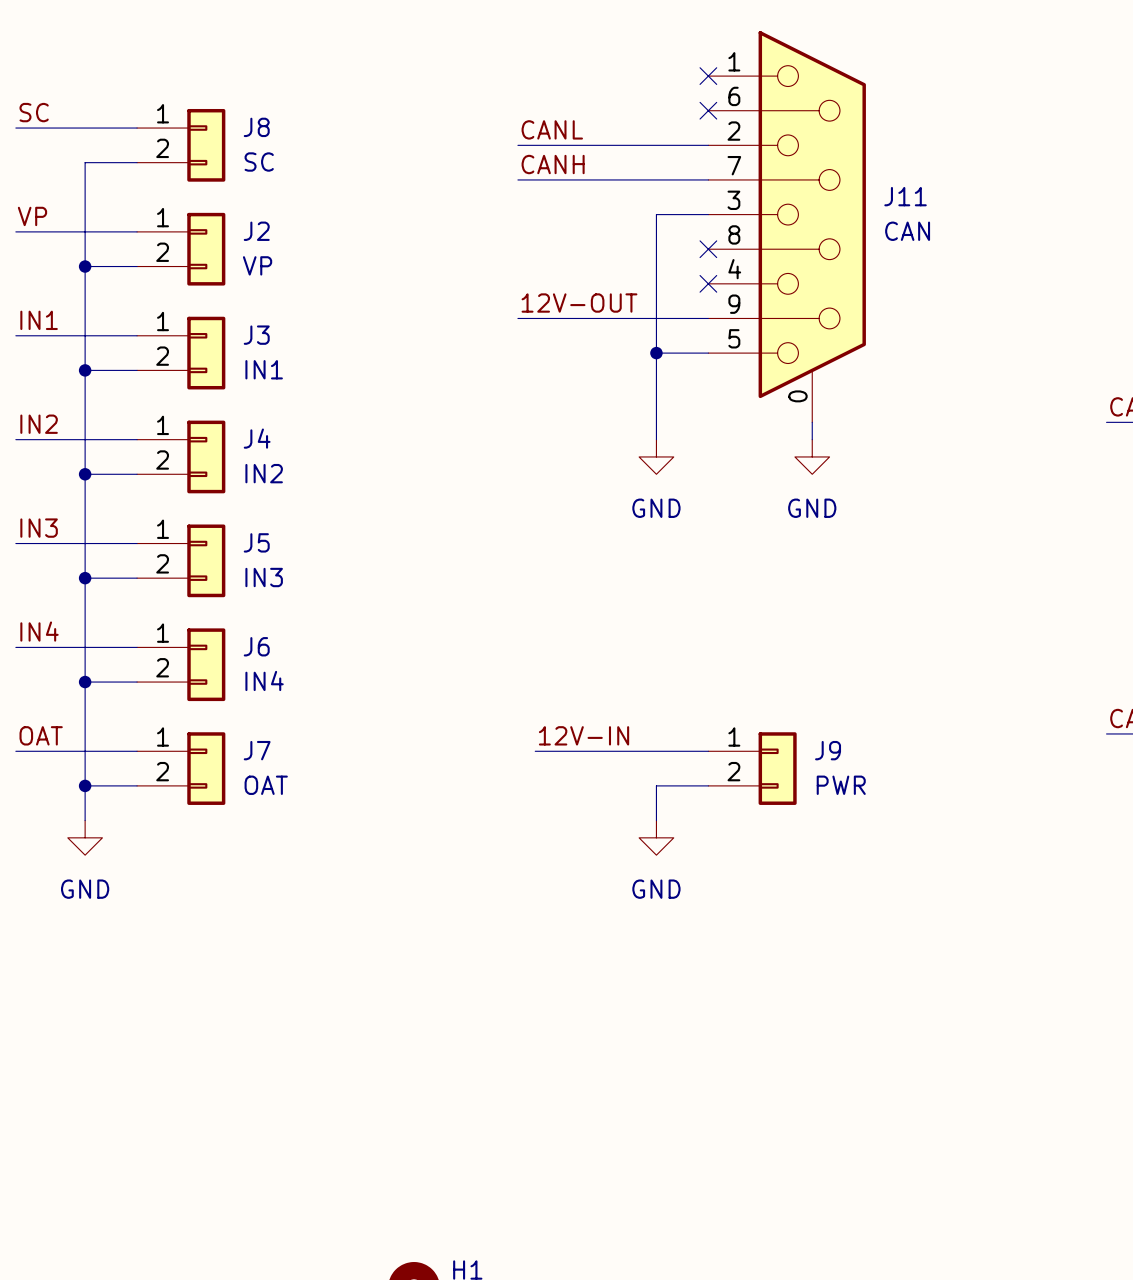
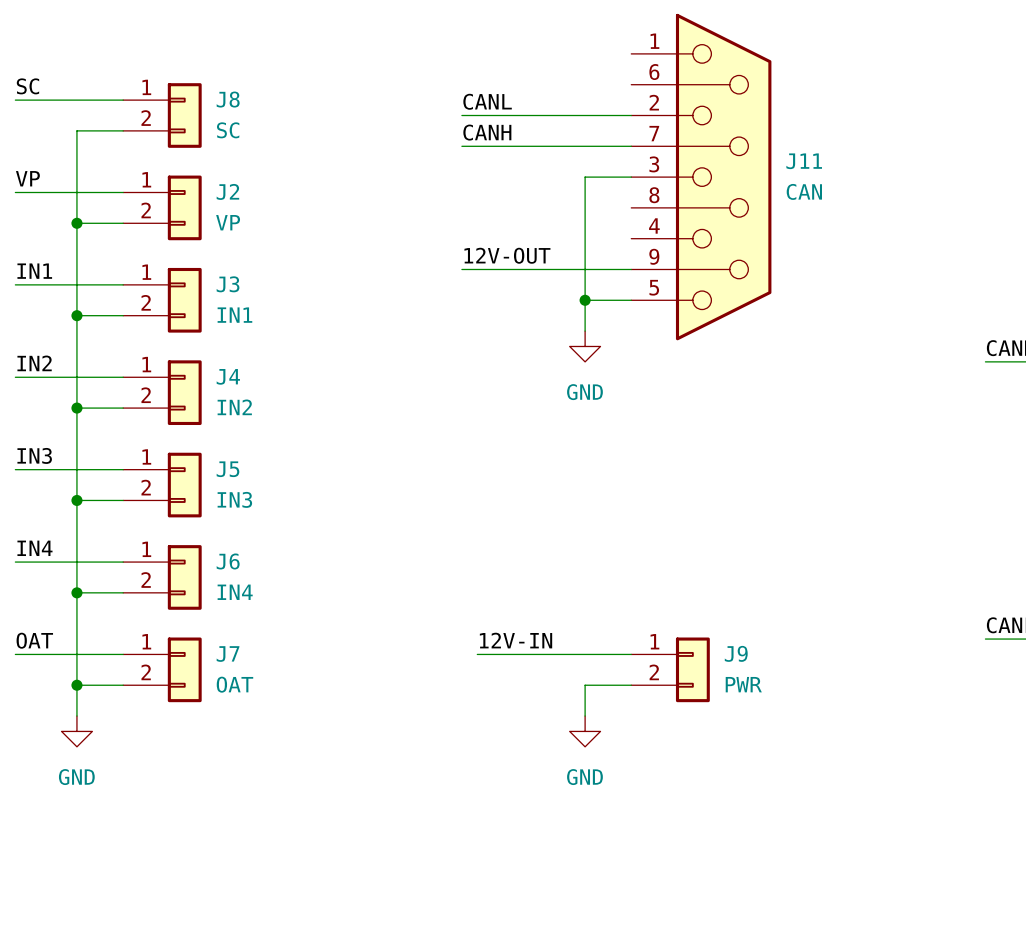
J11 symbol: [708, 31, 866, 423] -> [631, 13, 772, 341]
no-connect mark: (708, 76) -> none
no-connect mark: (708, 110) -> none
no-connect mark: (708, 249) -> none
no-connect mark: (708, 283) -> none
wire: (656, 387) (656, 439) -> none
wire: (812, 422) (812, 439) -> none
power symbol position: GND (656, 456) -> GND (585, 346)
power symbol: GND (812, 456) -> none

